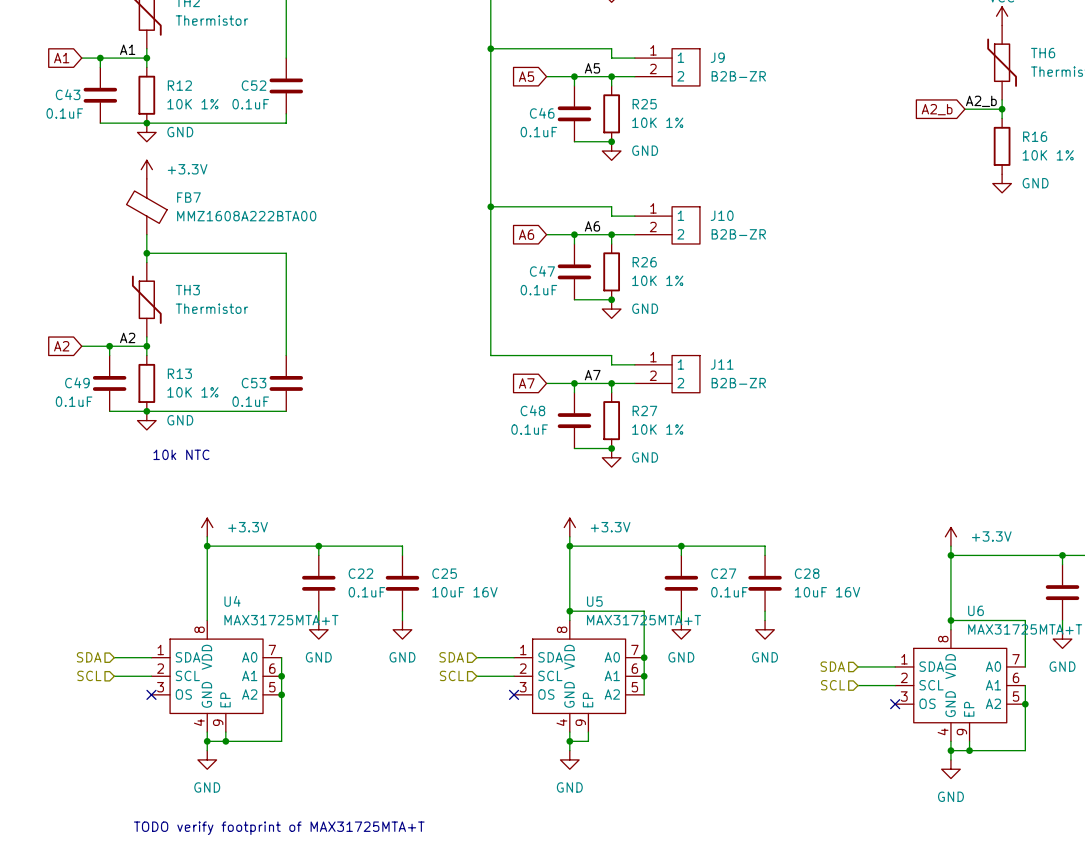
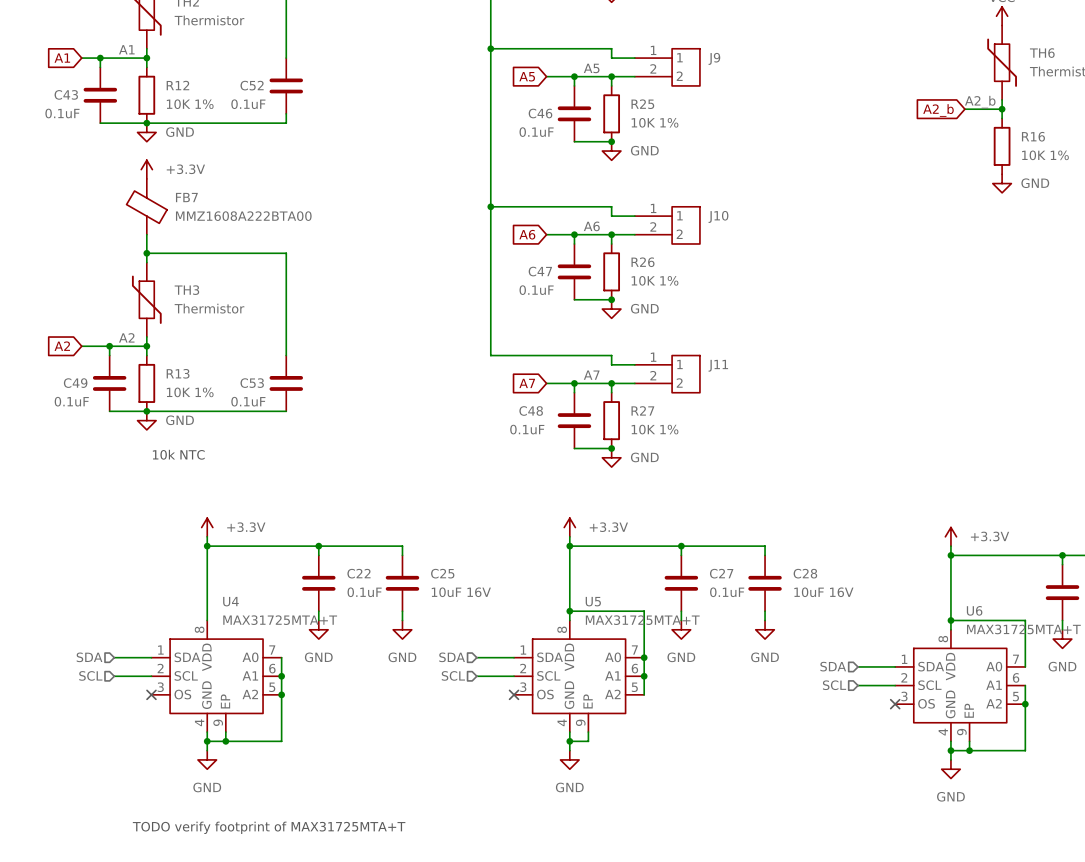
J9 value: B2B-ZR (738, 76) -> none
J10 value: B2B-ZR (738, 234) -> none
J11 value: B2B-ZR (738, 383) -> none

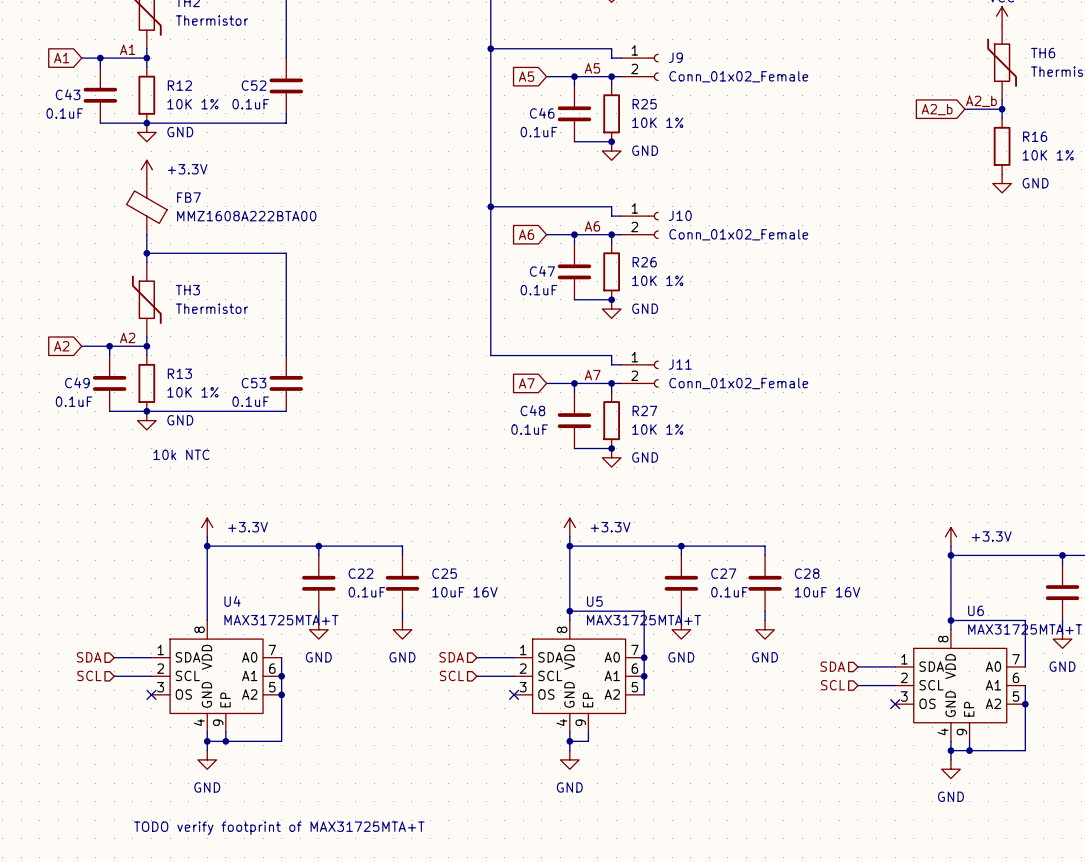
J9 symbol: [634, 48, 700, 86] -> [620, 53, 659, 81]
J9 value: none -> Conn_01x02_Female (738, 76)
J10 symbol: [634, 206, 700, 244] -> [620, 211, 659, 239]
J10 value: none -> Conn_01x02_Female (738, 234)
J11 symbol: [634, 355, 700, 393] -> [620, 360, 659, 388]
J11 value: none -> Conn_01x02_Female (738, 383)

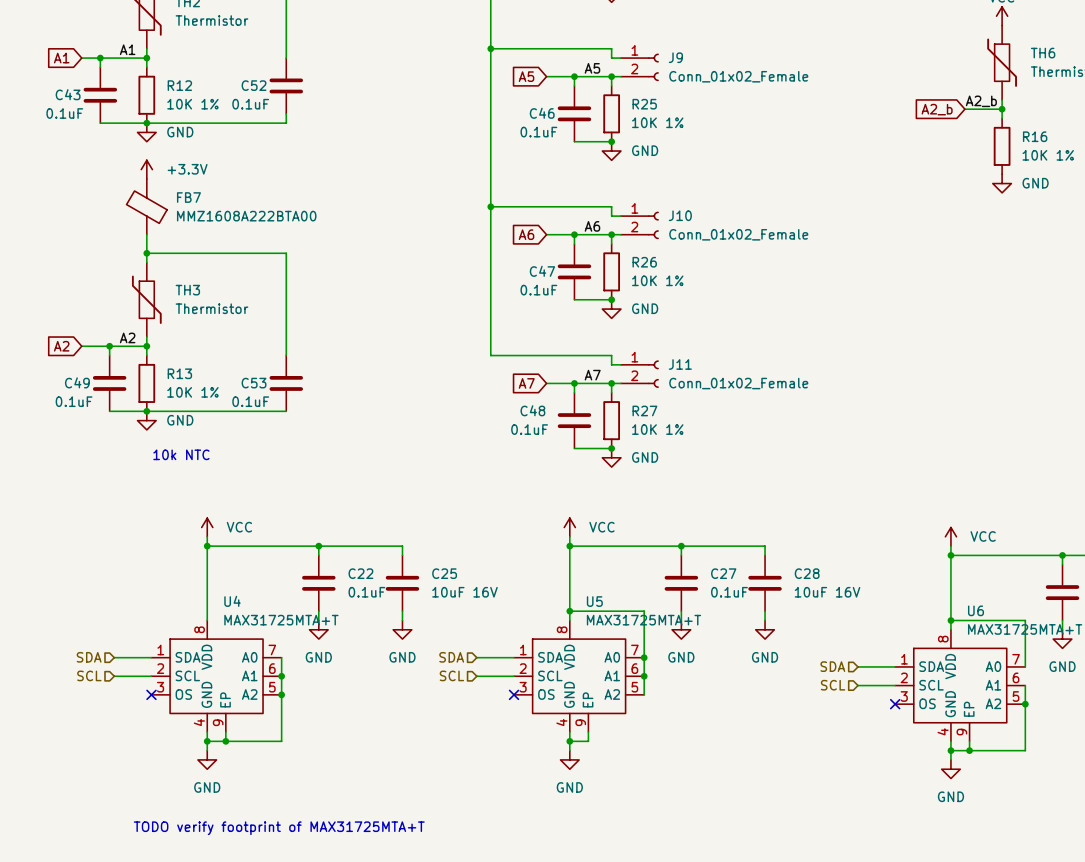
power symbol: +3.3V (207, 527) -> VCC (207, 527)
power symbol: +3.3V (569, 527) -> VCC (569, 527)
power symbol: +3.3V (950, 536) -> VCC (950, 536)

